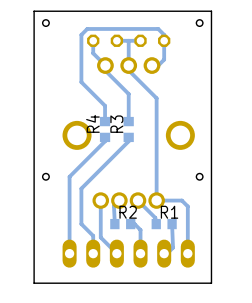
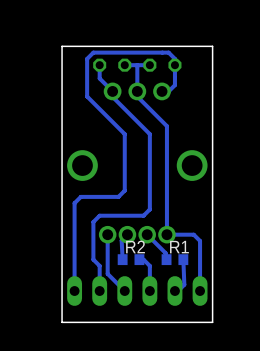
hole: (45, 23) -> none
hole: (199, 23) -> none
track: (81, 70) (81, 82) (105, 105) (105, 121) -> (87, 96) (124, 134) (124, 190) (118, 196) (80, 196) (74, 203) (74, 209)
track: (128, 94) (128, 121) -> none
R4: (105, 129) -> none
R3: (128, 129) -> none
track: (105, 137) (105, 141) (69, 176) -> none
track: (128, 137) (128, 141) (81, 188) (81, 224) (93, 235) -> (137, 121) (149, 134) (149, 209) (143, 215) (99, 215) (93, 222) (93, 259) (99, 265) (99, 272)
hole: (45, 176) -> none
hole: (199, 176) -> none
board edge: (199, 283) (211, 283) (211, 11) (34, 11) (34, 283) (57, 283) -> (212, 322) (212, 46) (62, 46) (62, 322)

